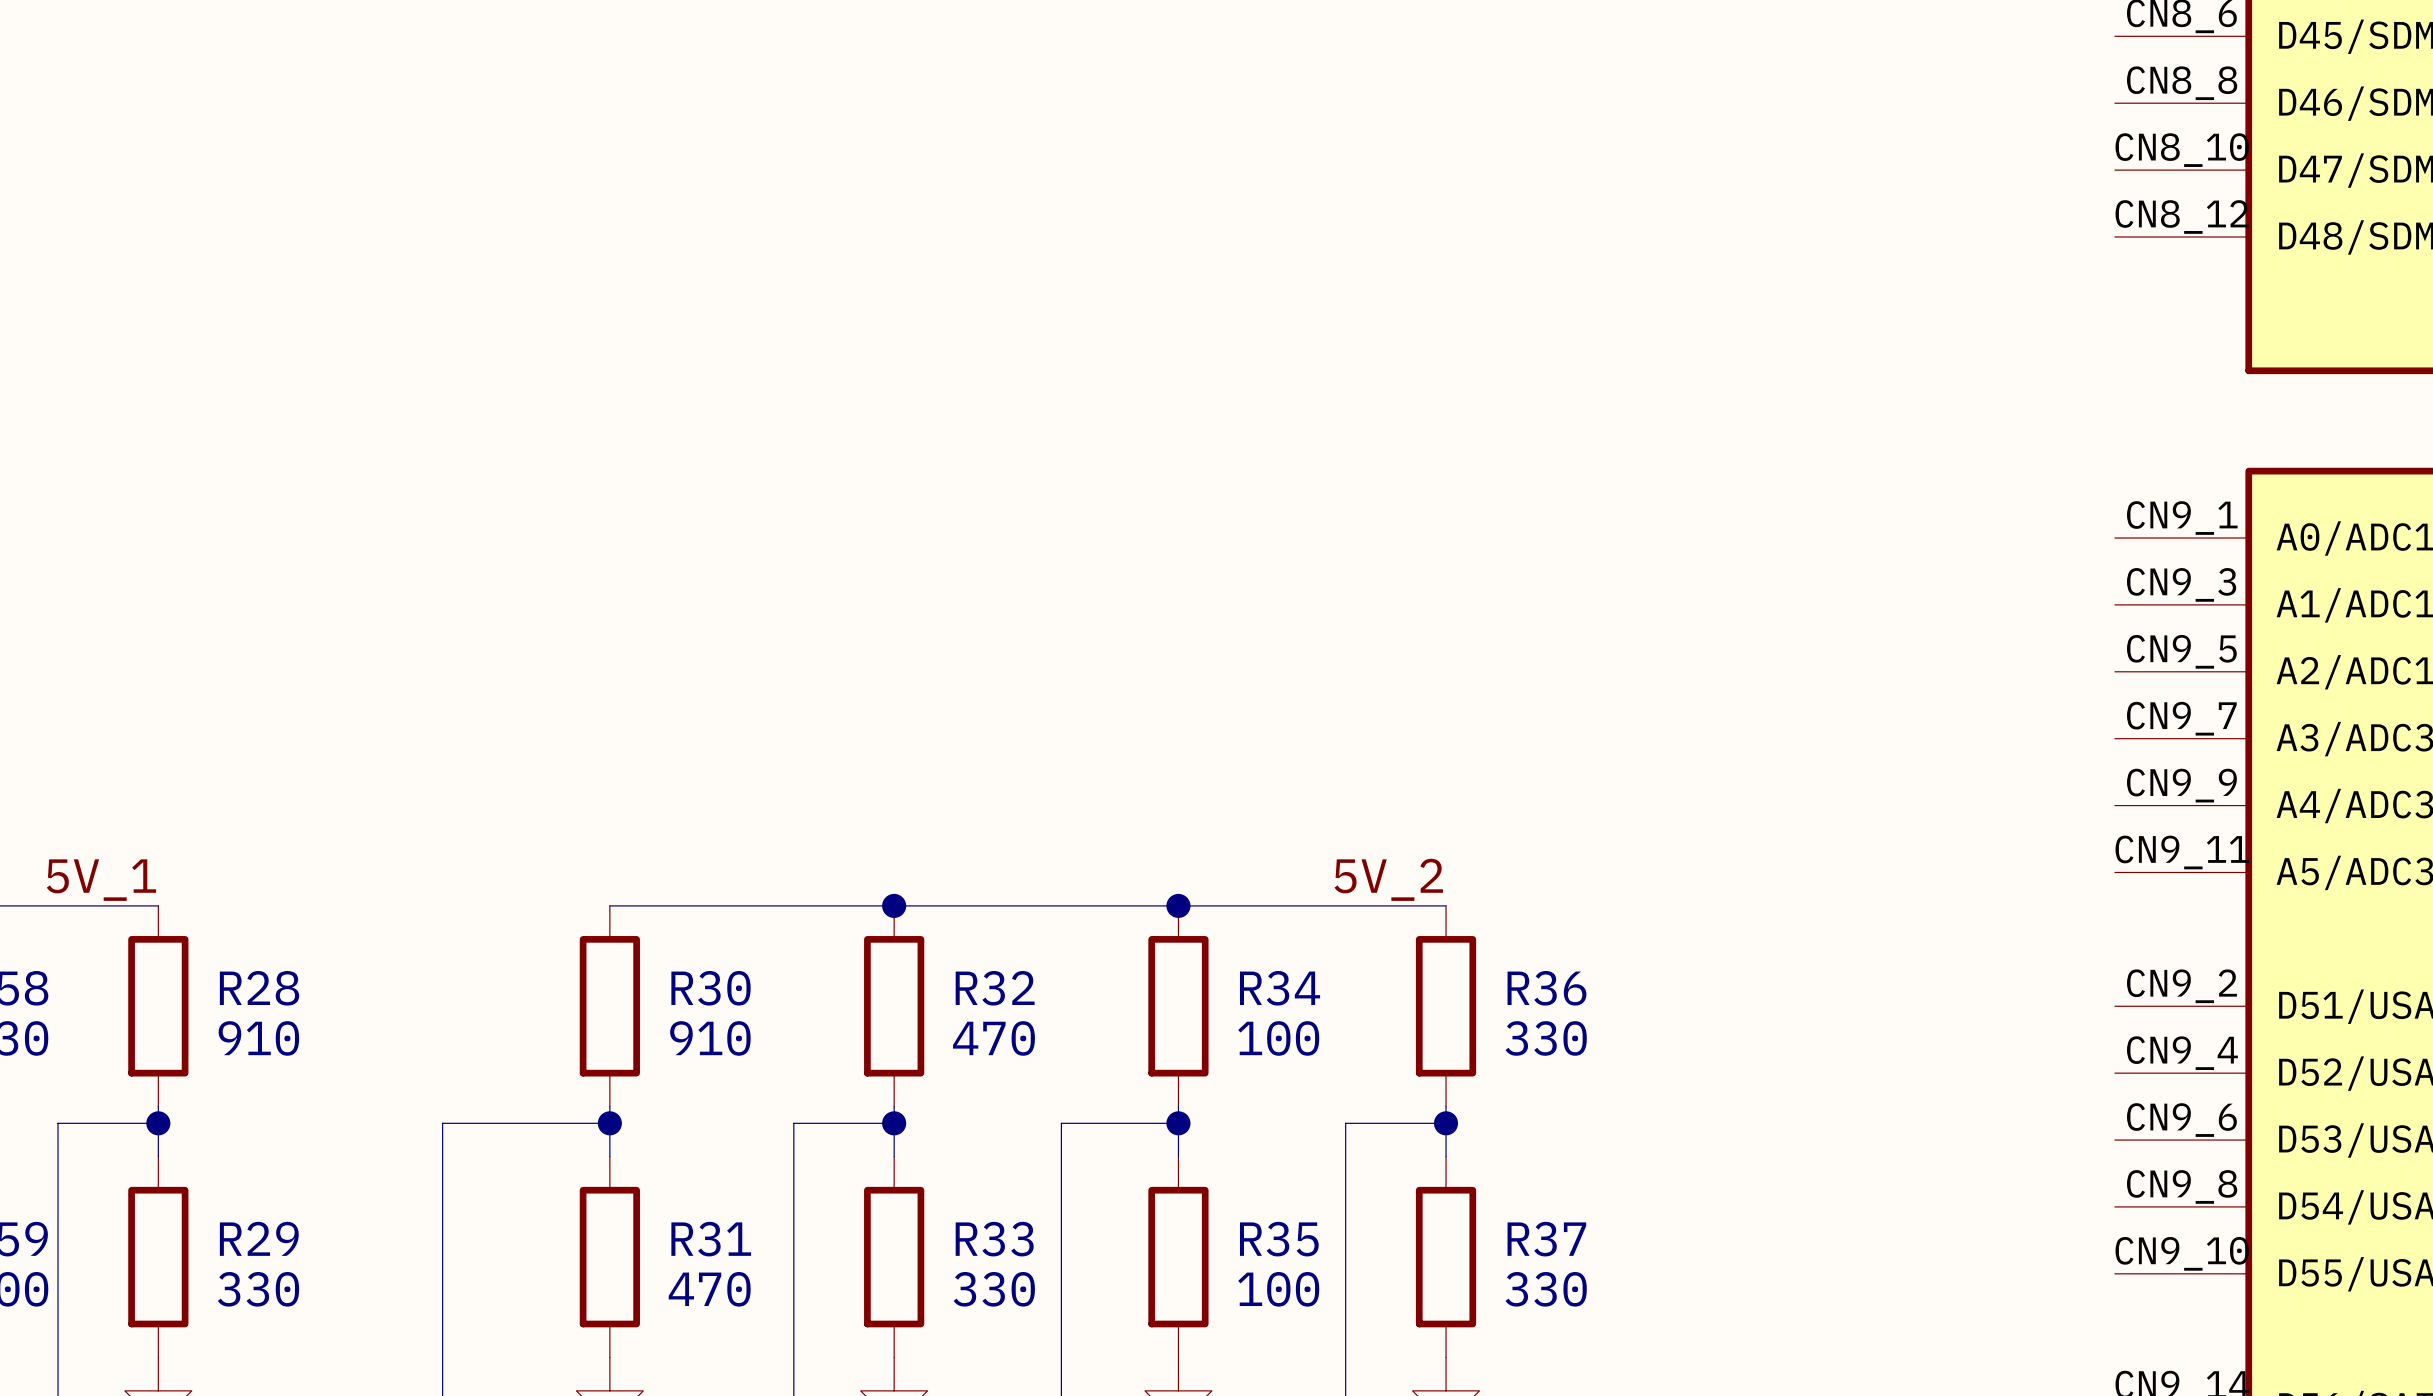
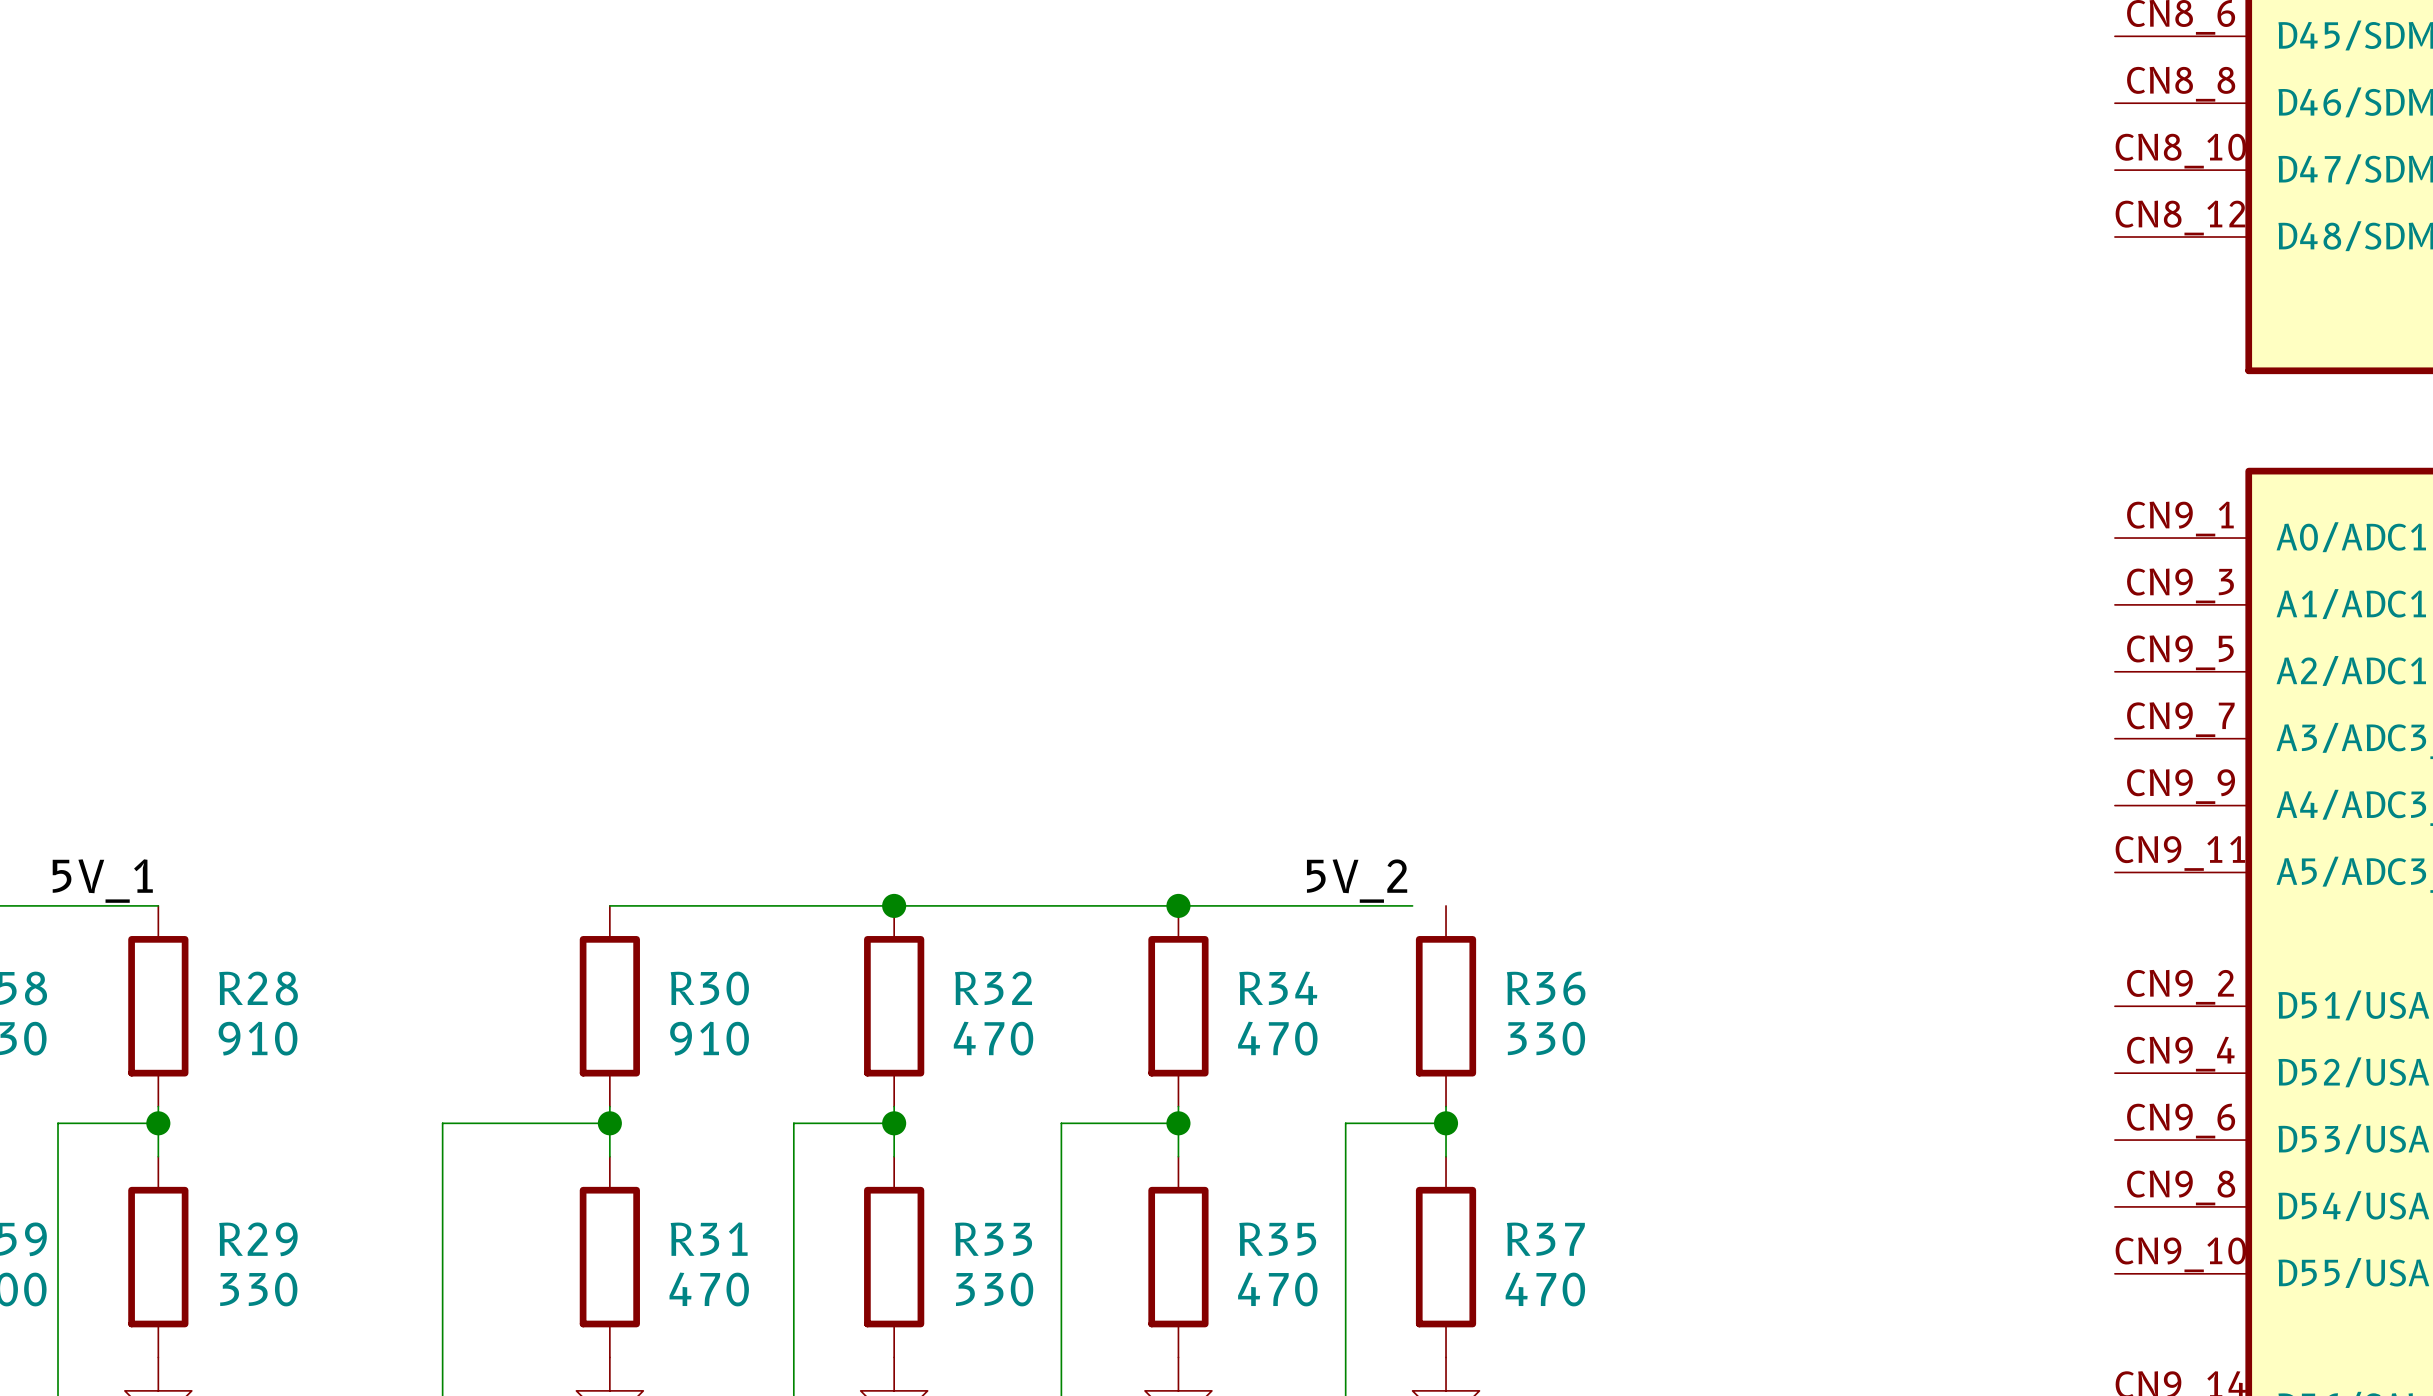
label position: 5V_2 (1388, 879) -> 5V_2 (1357, 881)
wire: (1412, 905) (1446, 905) -> none
R34 value: 100 (1278, 1038) -> 470 (1277, 1038)
R35 value: 100 (1278, 1289) -> 470 (1277, 1289)
R37 value: 330 (1546, 1289) -> 470 (1545, 1289)

